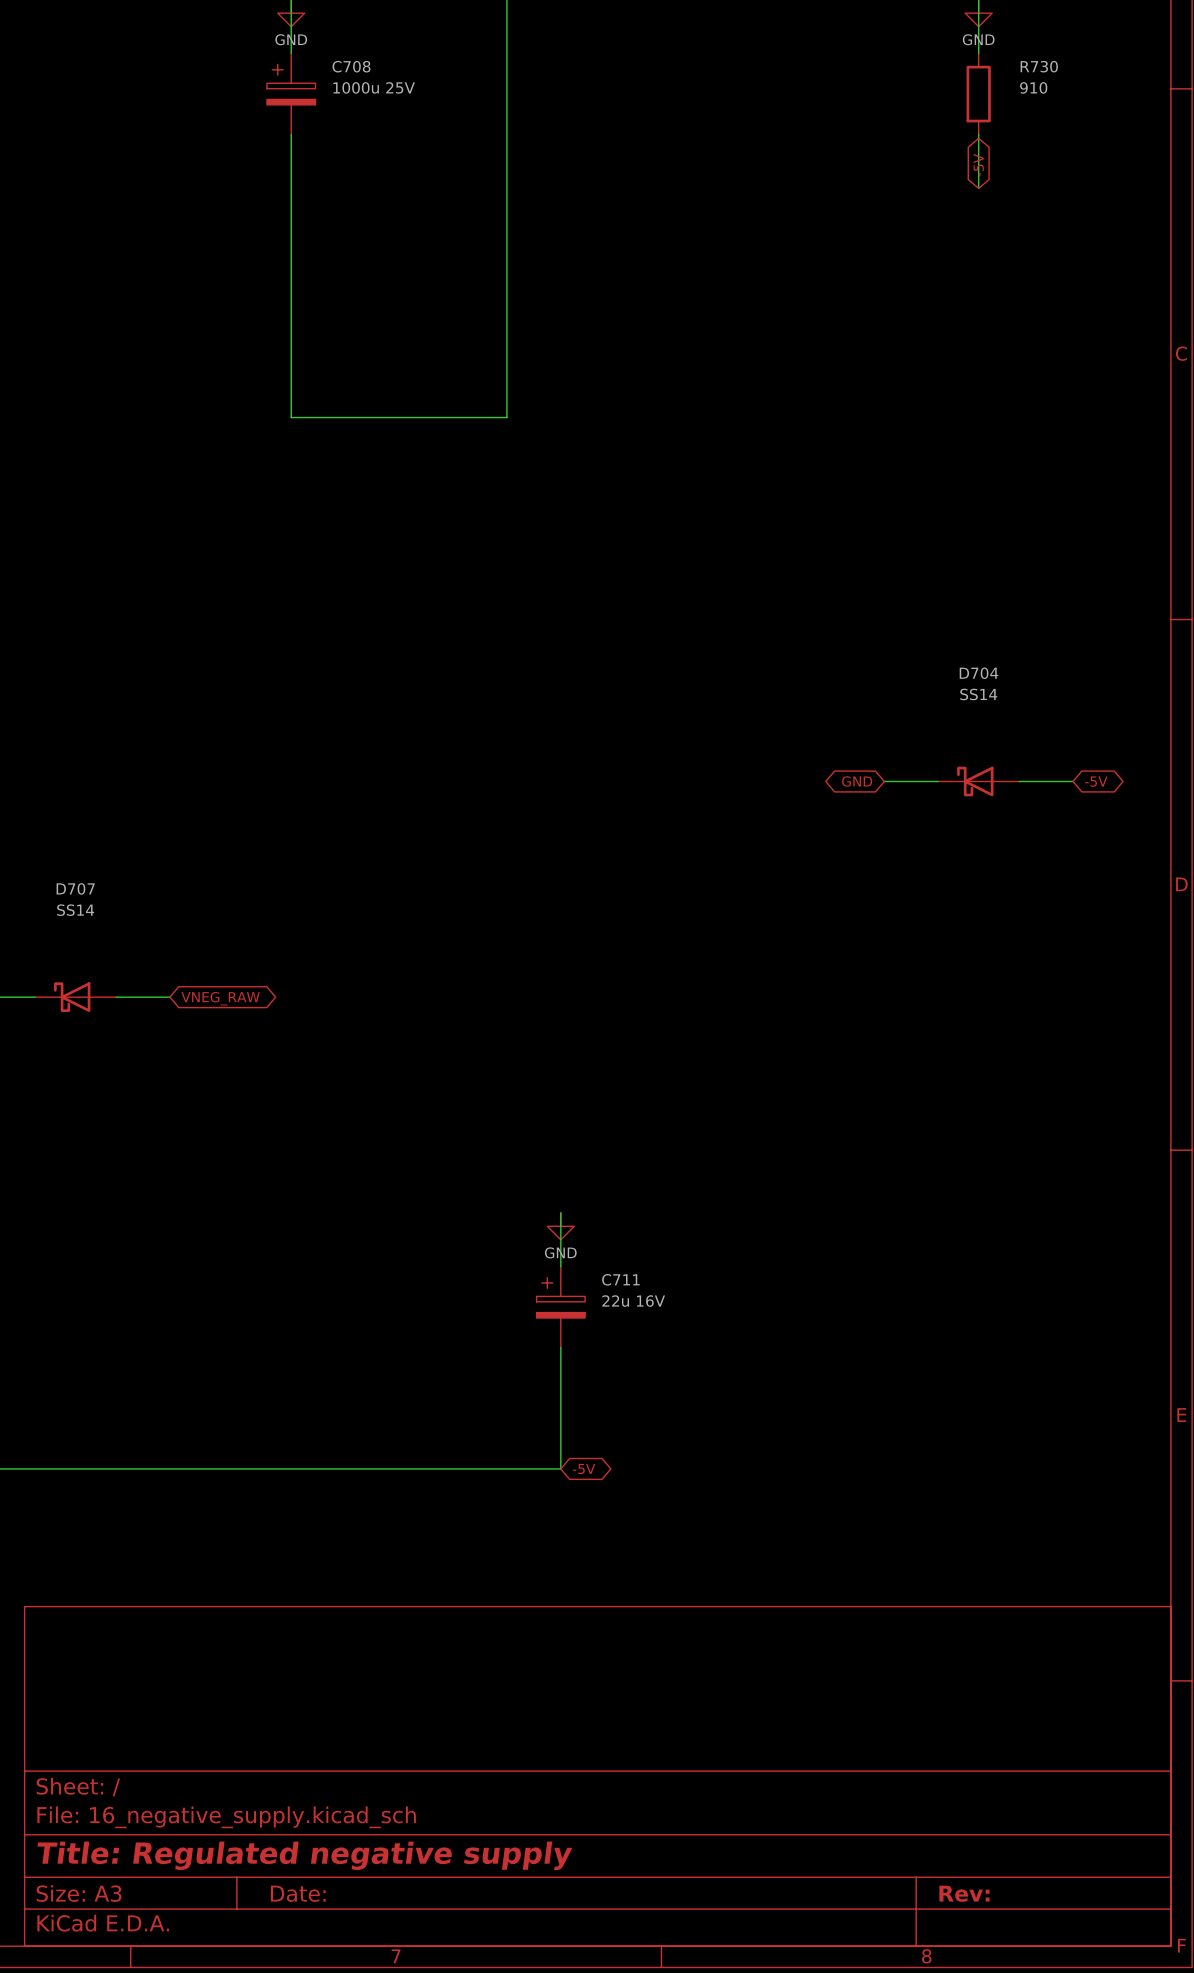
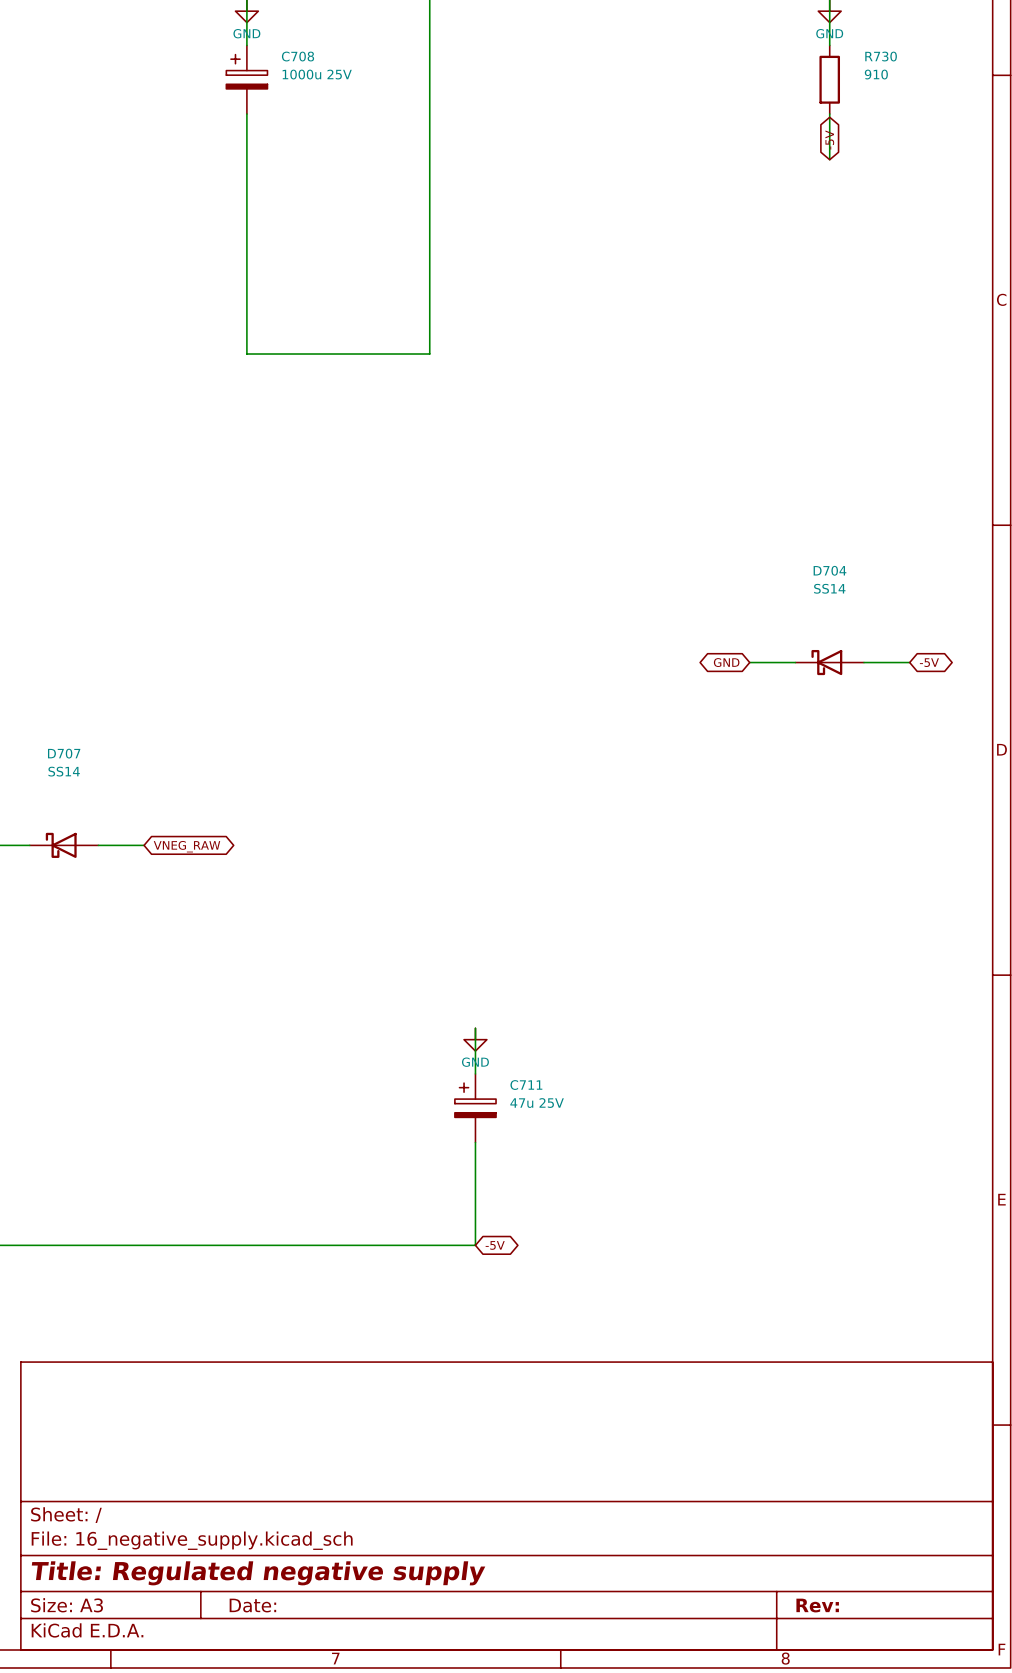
C711 value: 22u 16V (633, 1301) -> 47u 25V (537, 1103)

